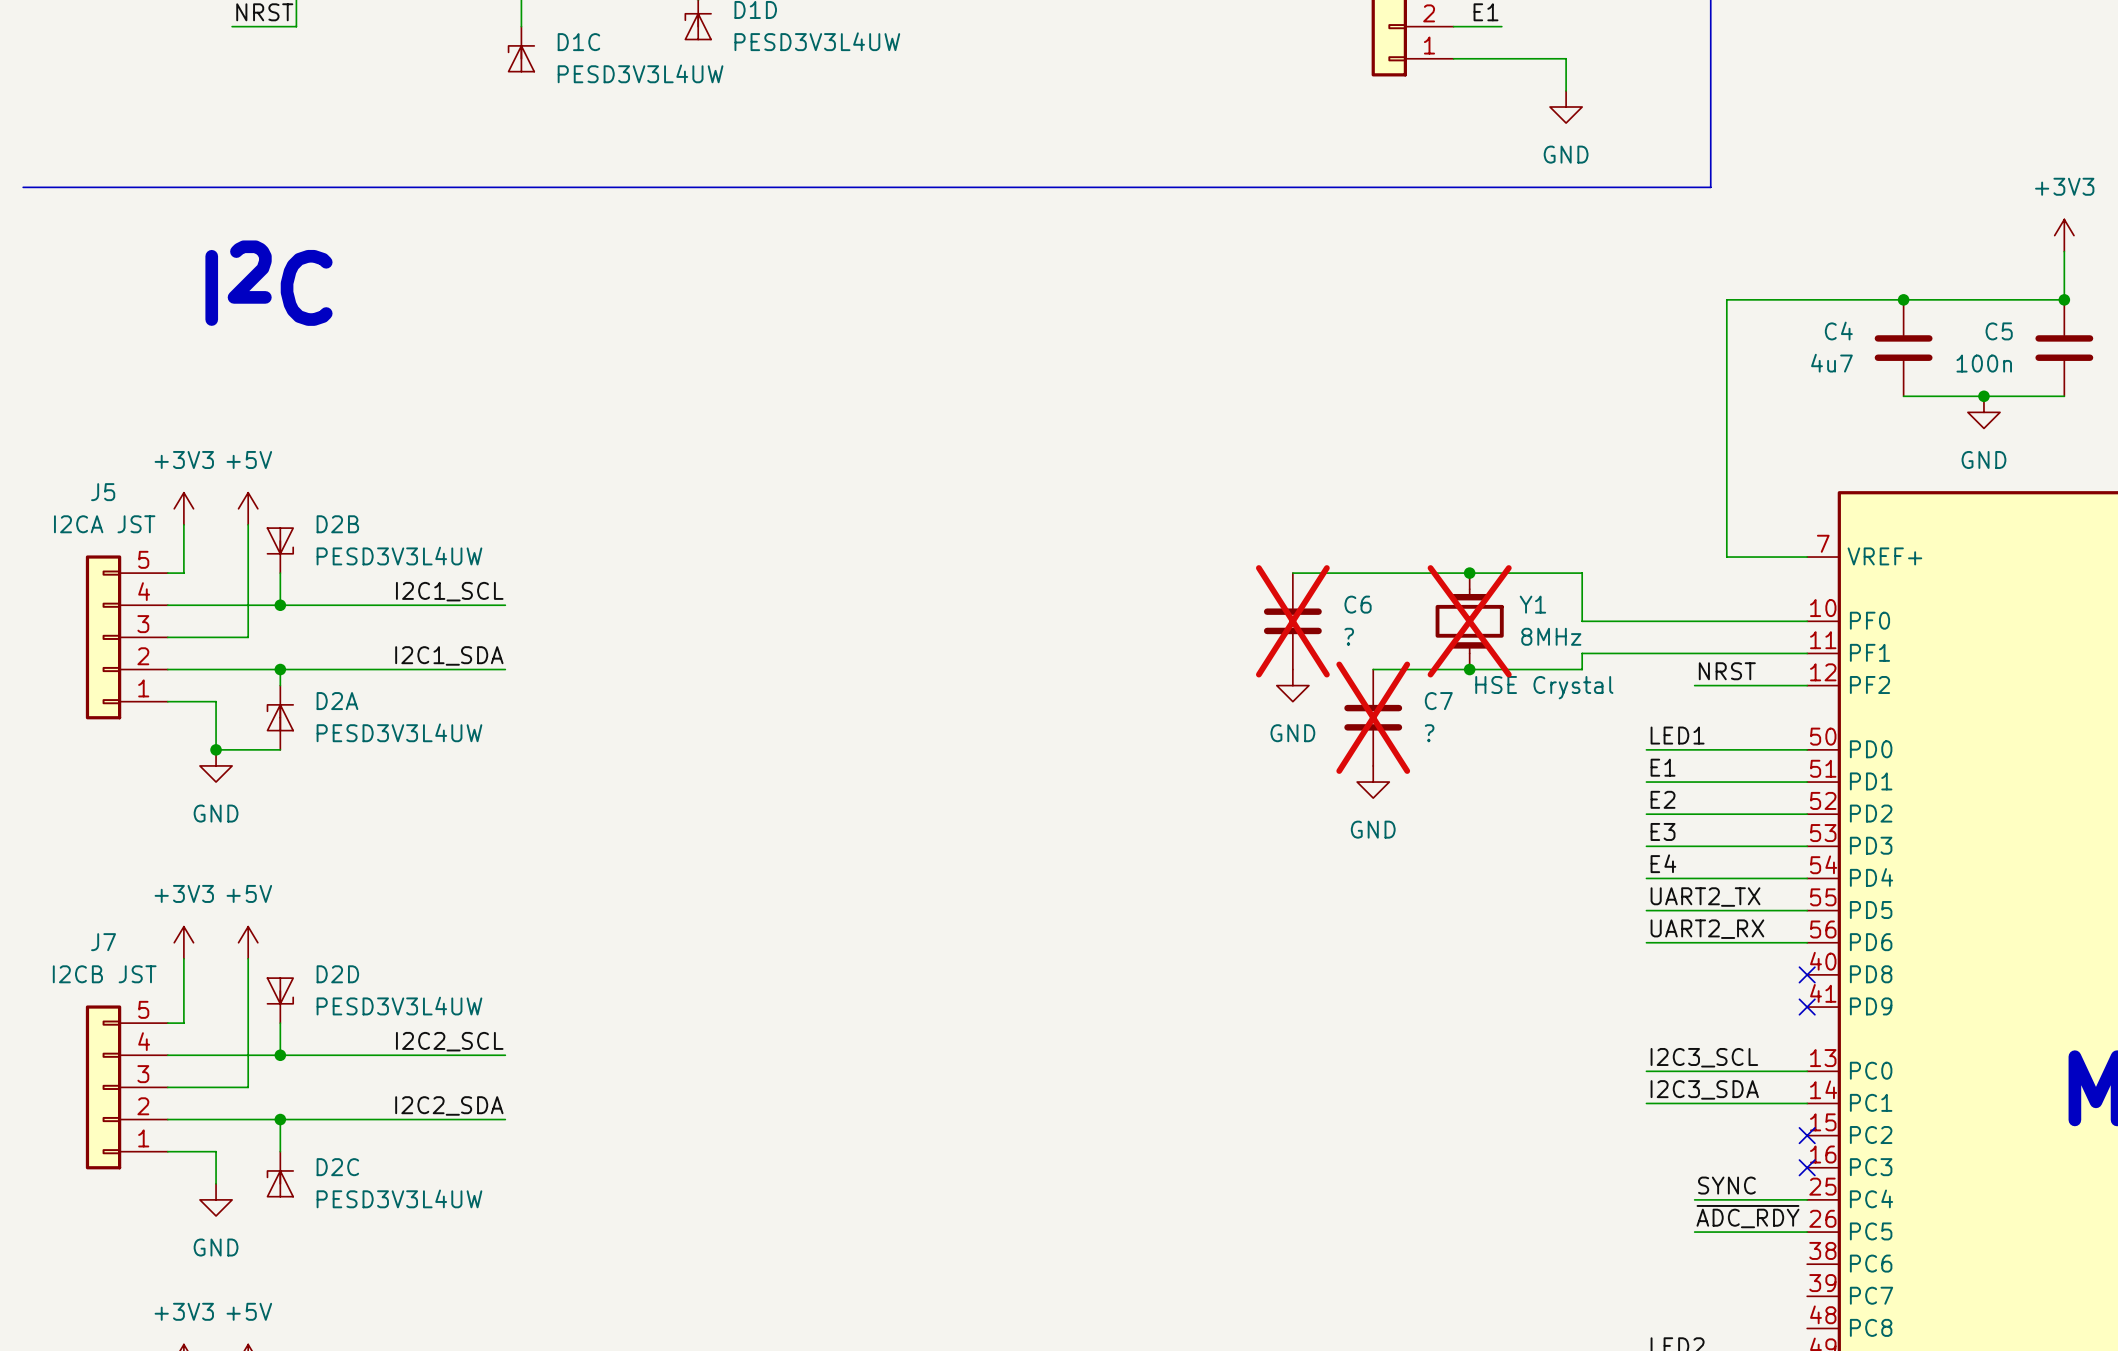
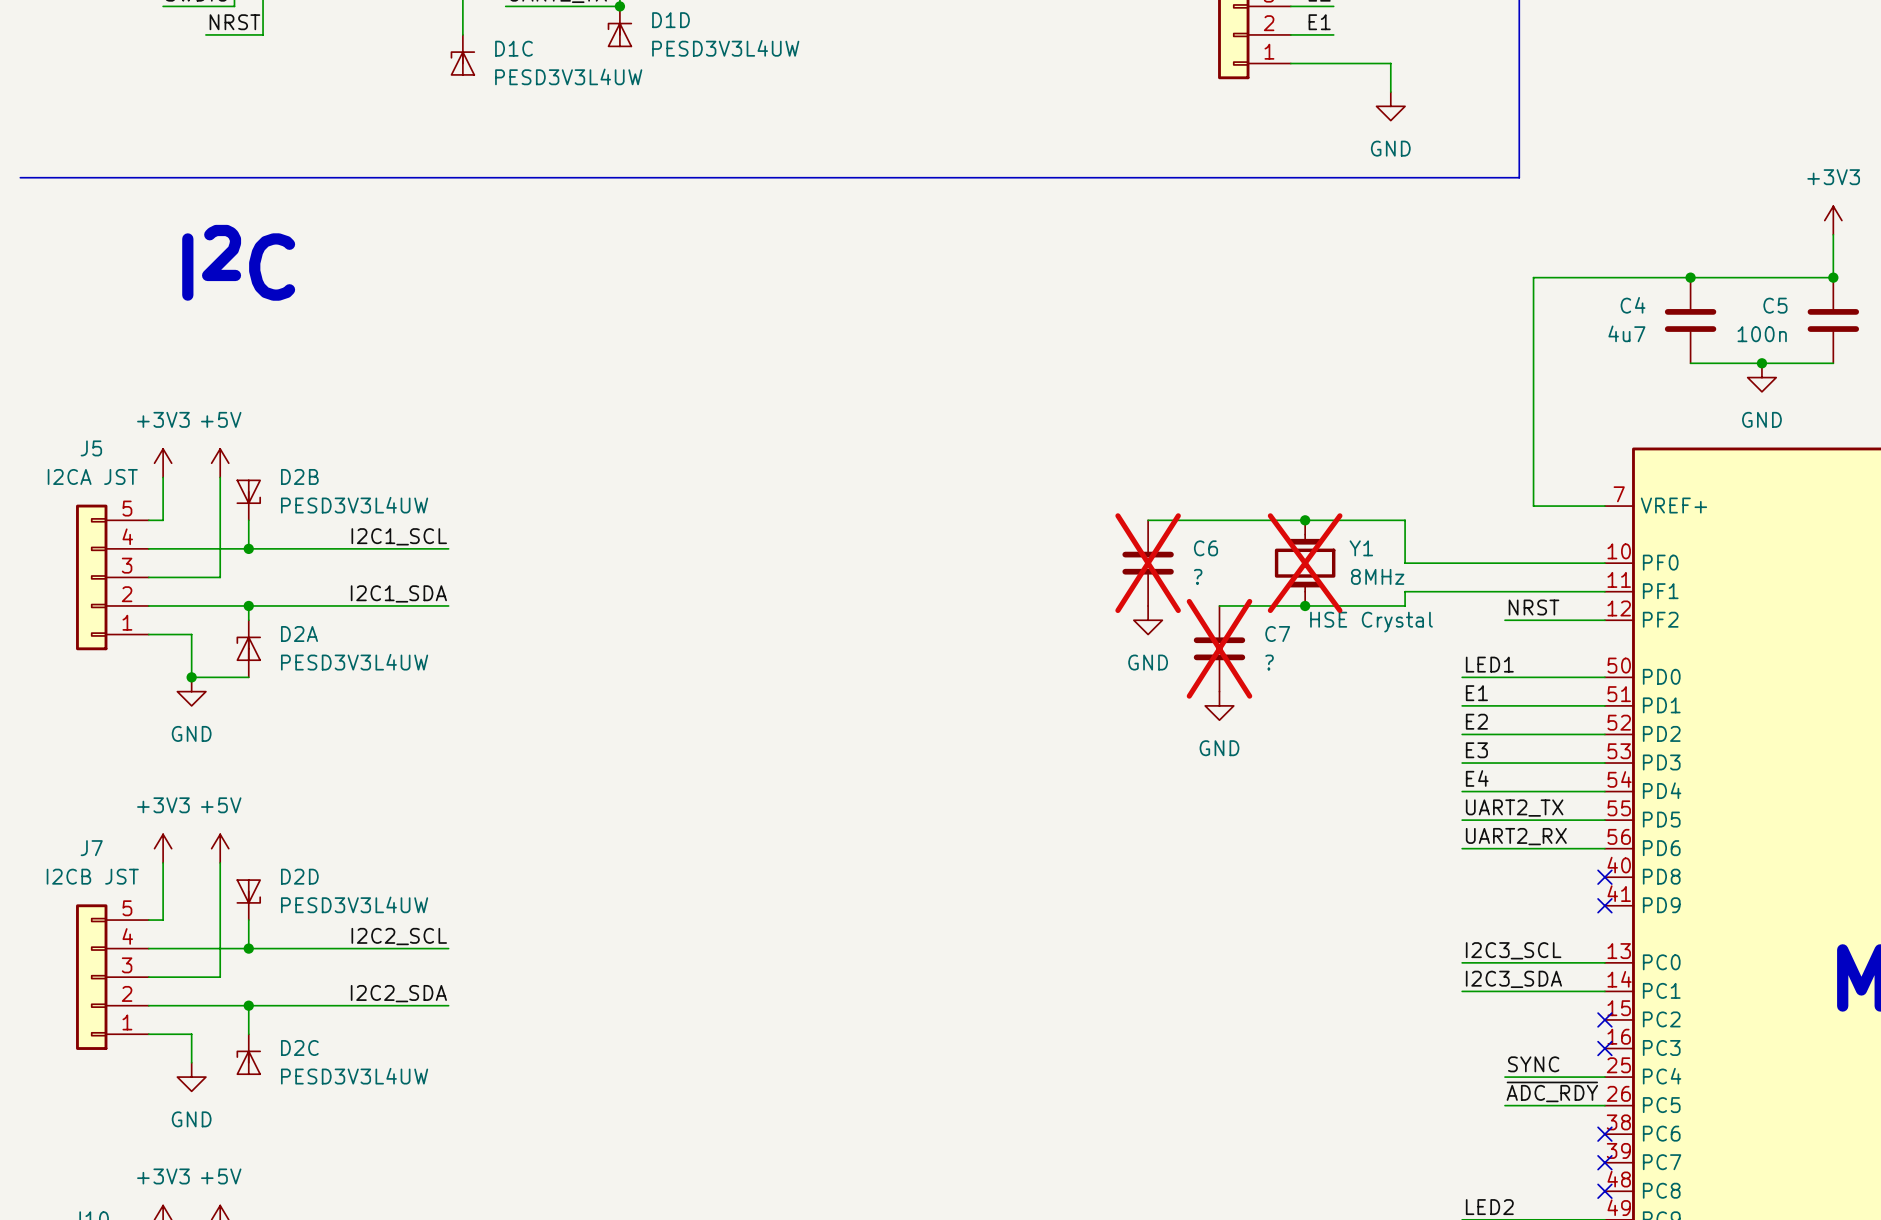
no-connect mark: none -> (1604, 1134)
no-connect mark: none -> (1604, 1162)
no-connect mark: none -> (1604, 1191)

